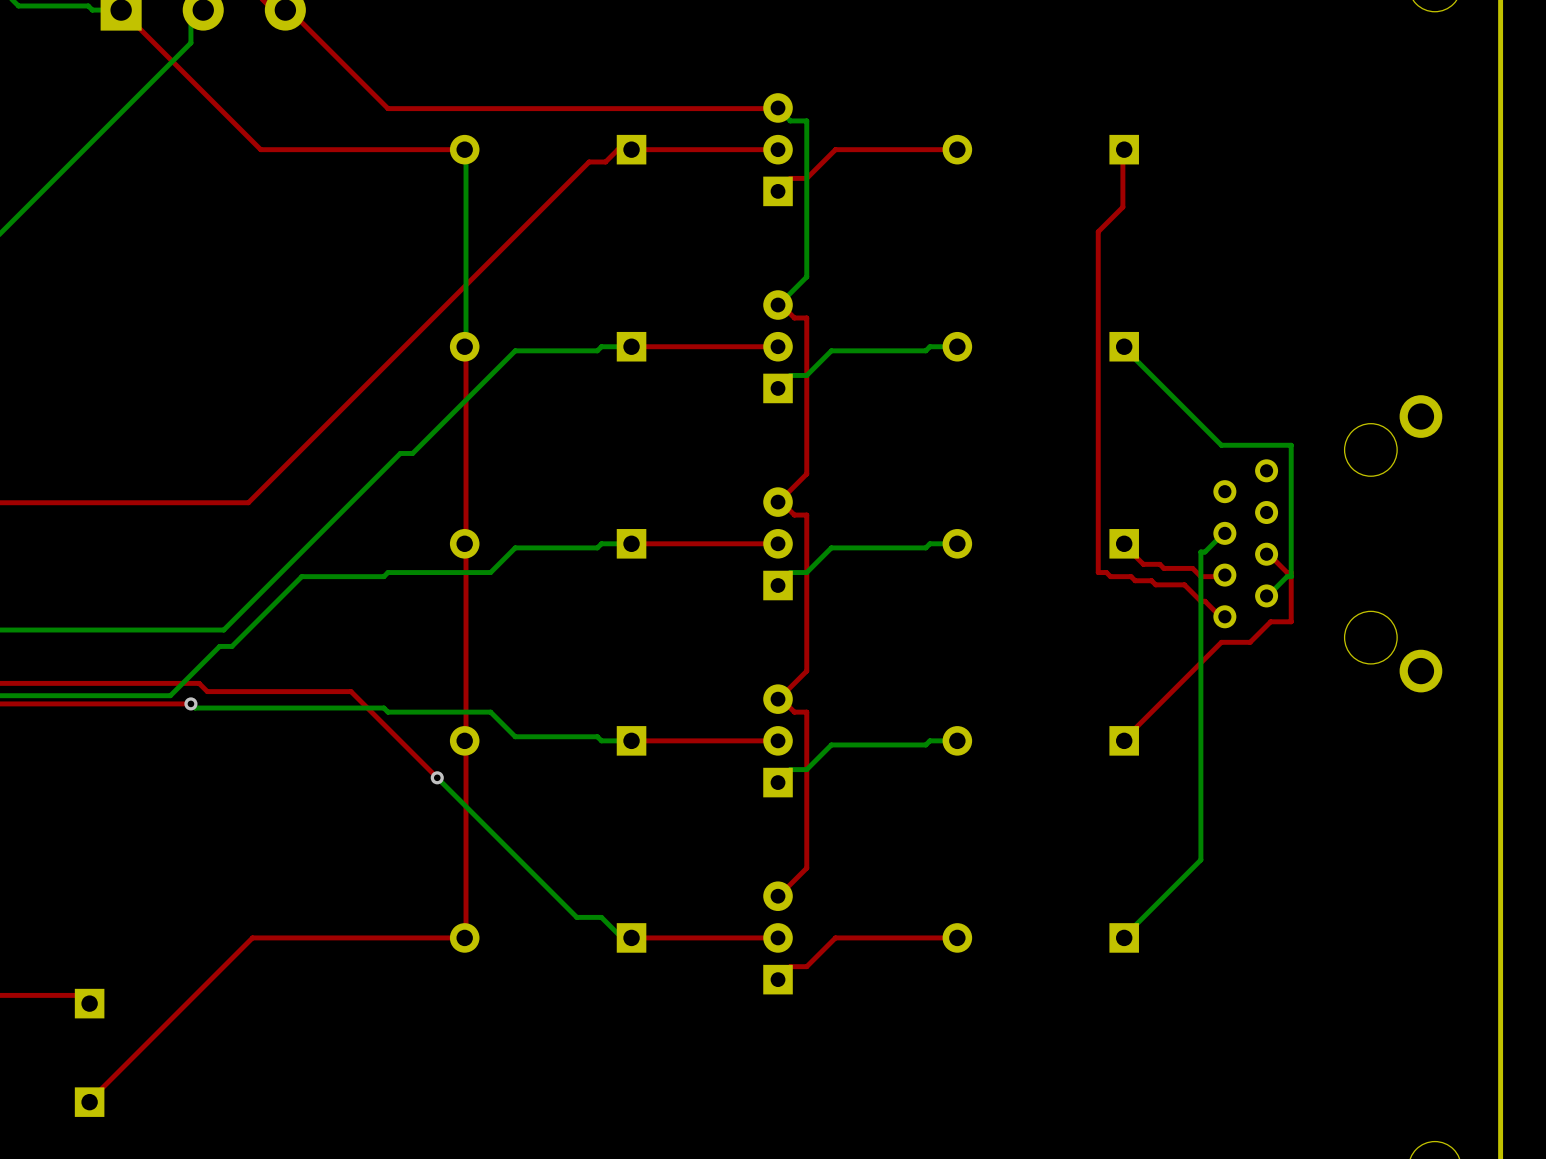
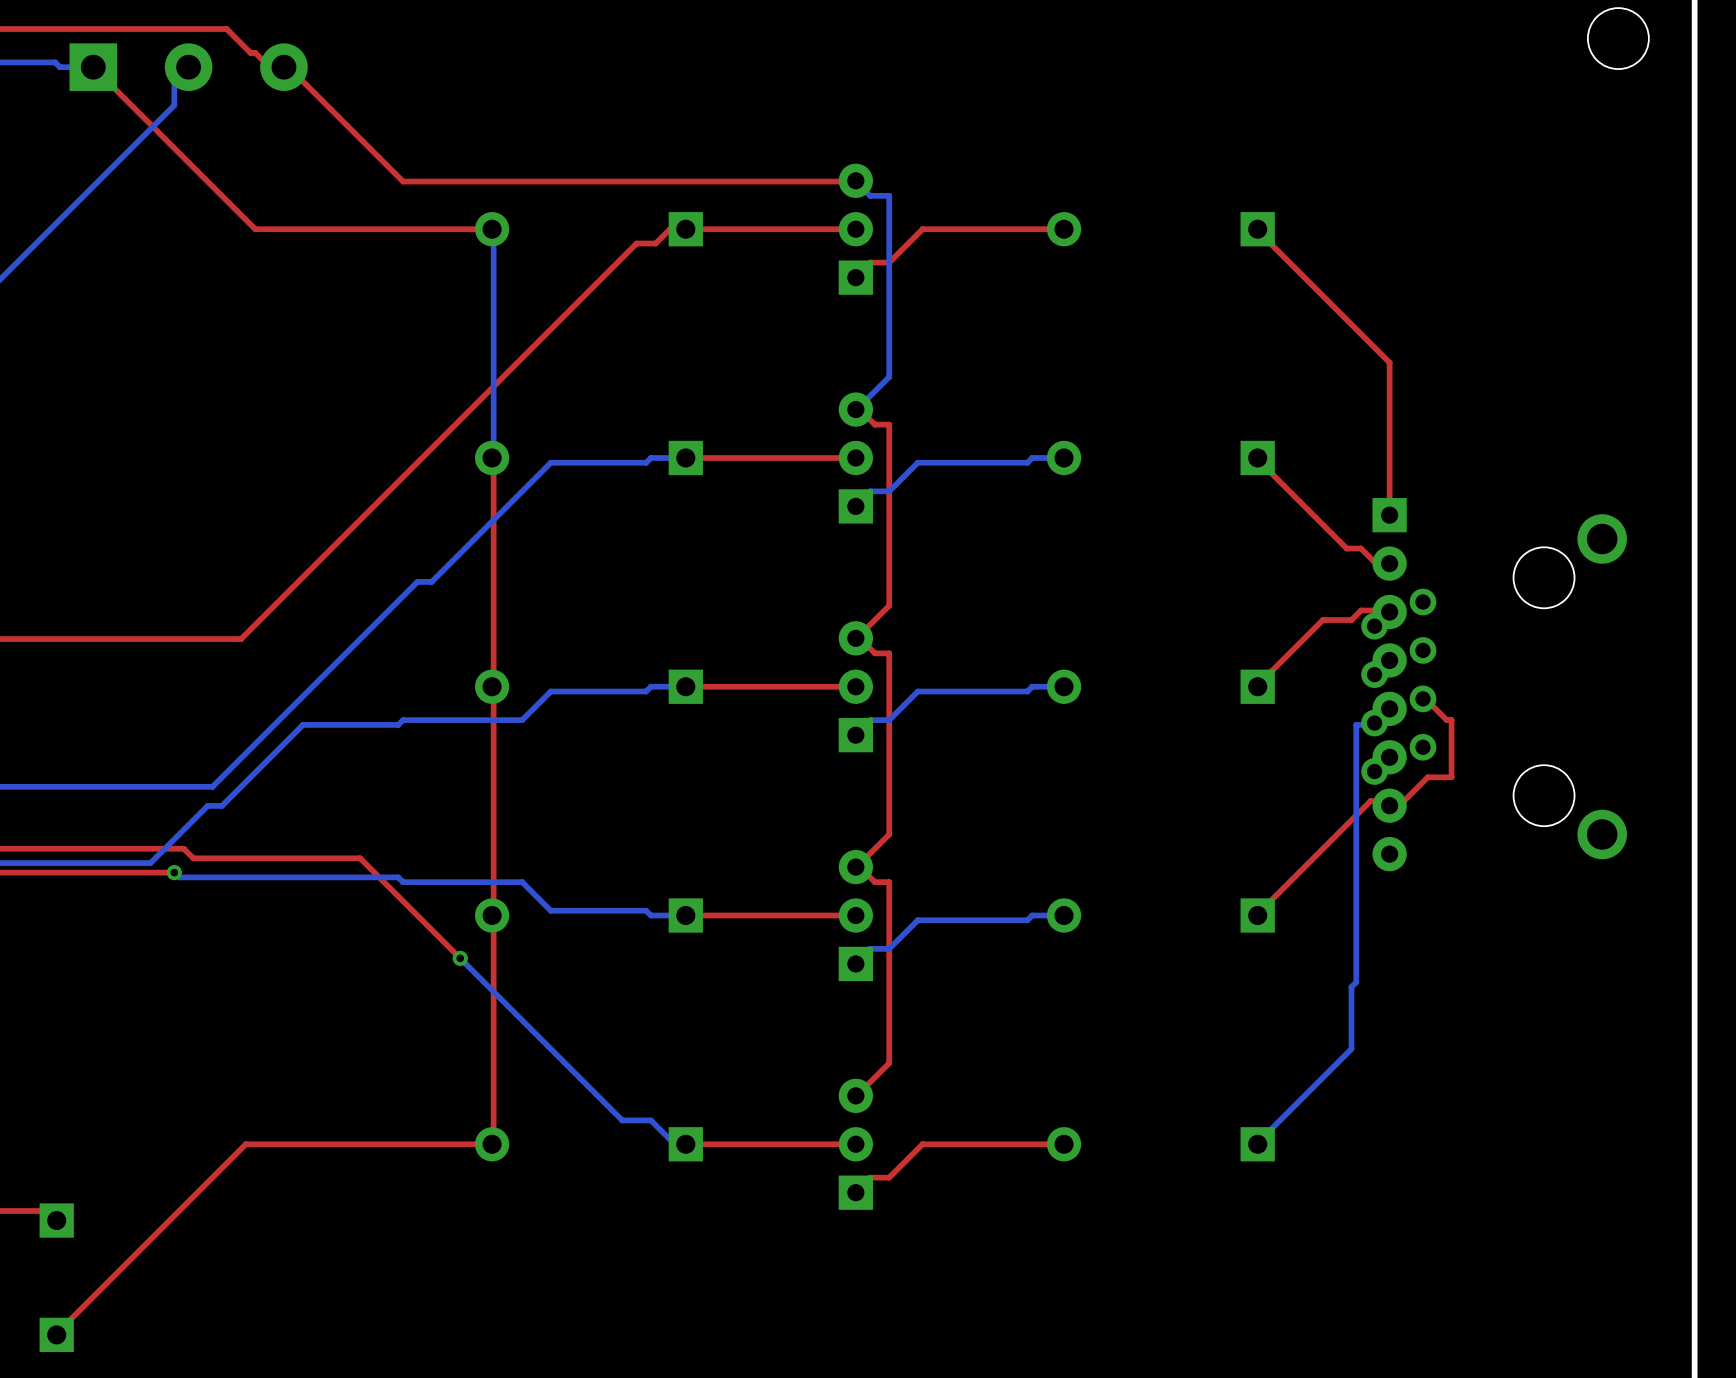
top track: (1122, 149) (1122, 207) (1098, 231) (1098, 572) (1106, 572) (1110, 576) (1131, 576) (1135, 580) (1151, 580) (1155, 584) (1184, 584) (1200, 601) (1205, 601) (1217, 613) (1221, 613) (1224, 616) -> (1256, 229) (1389, 362) (1389, 515)
top track: none -> (1257, 457) (1256, 457) (1346, 548) (1361, 548) (1375, 562) (1389, 563)
bottom track: (1124, 346) (1221, 445) (1291, 445) (1291, 576) (1287, 576) (1266, 595) -> none
bottom track: (1224, 533) (1225, 531) (1205, 552) (1200, 552) (1200, 859) -> (1389, 708) (1375, 724) (1356, 724) (1356, 982) (1351, 987) (1351, 1048) (1346, 1053)
part: none -> (1389, 684)
top track: (1122, 543) (1143, 564) (1159, 564) (1163, 568) (1192, 568) (1200, 576) (1225, 576) (1224, 575) -> (1256, 686) (1322, 620) (1351, 620) (1361, 610) (1389, 610) (1389, 612)

